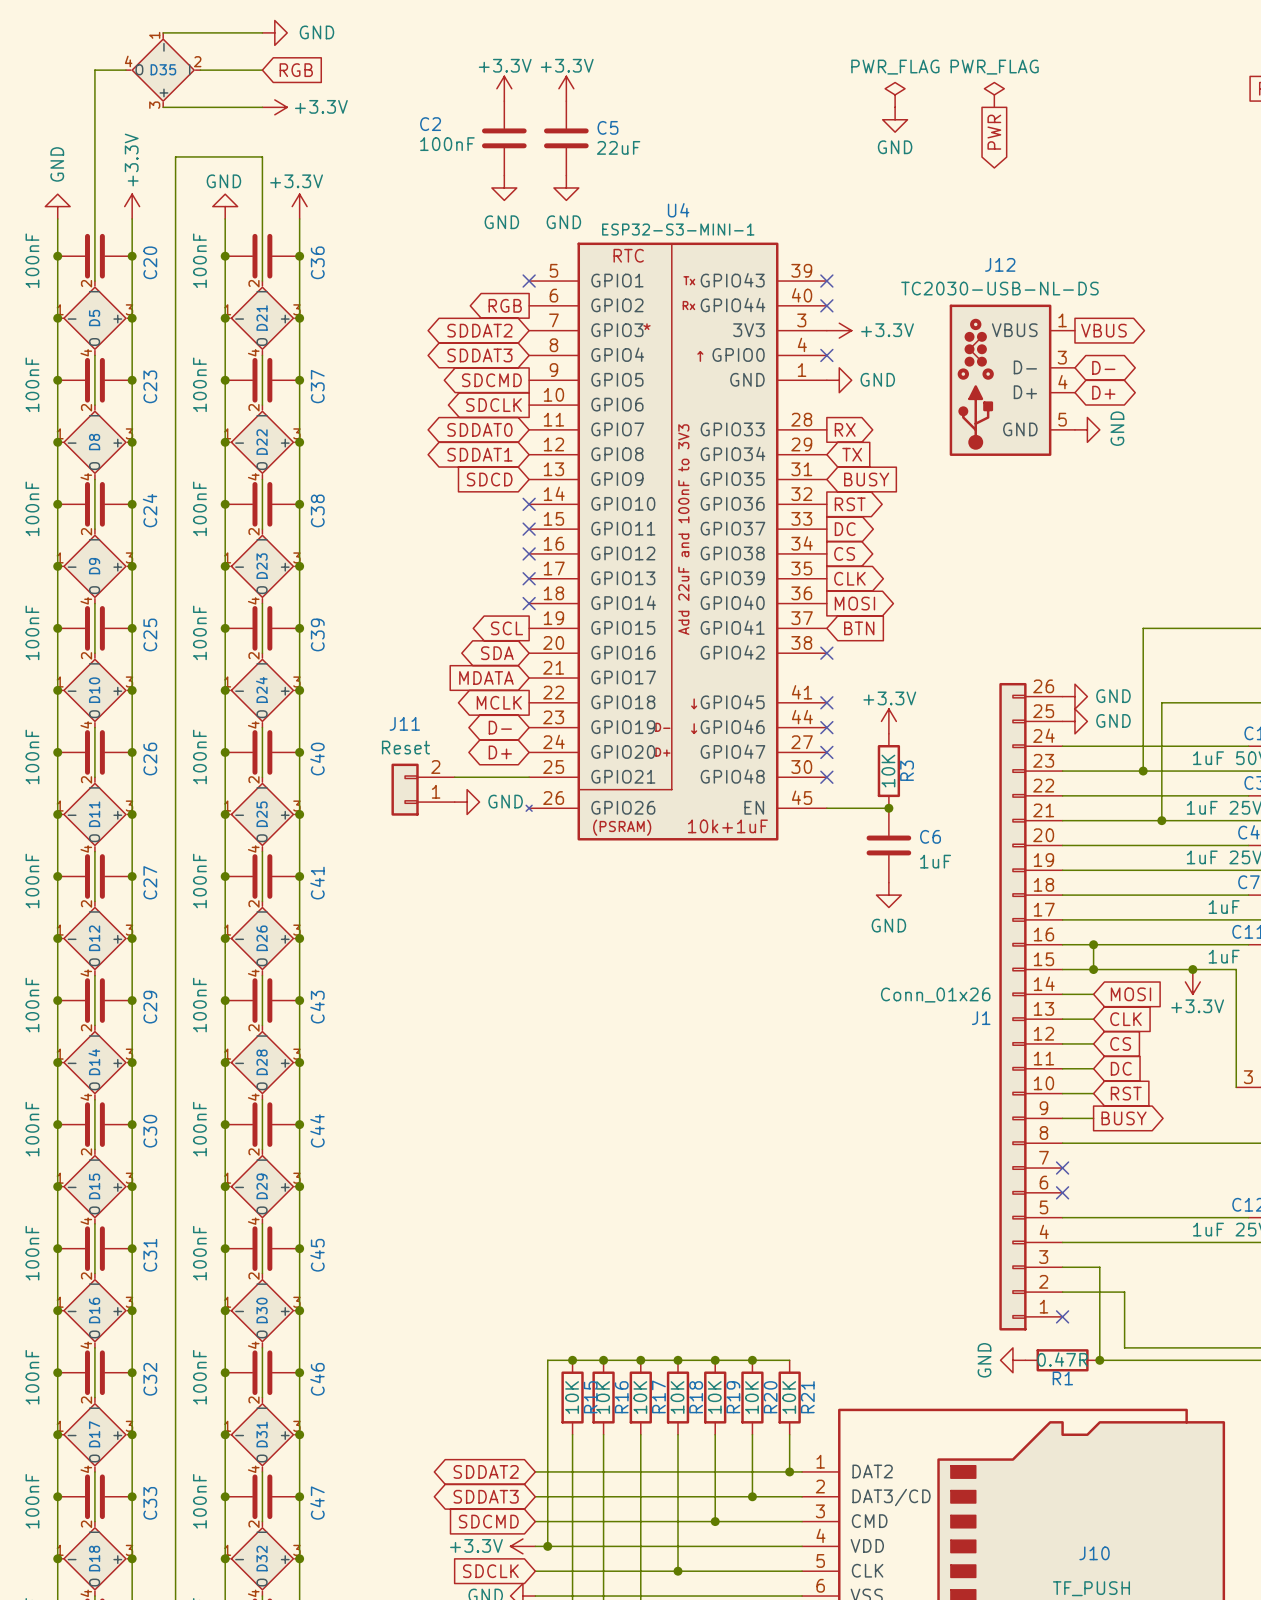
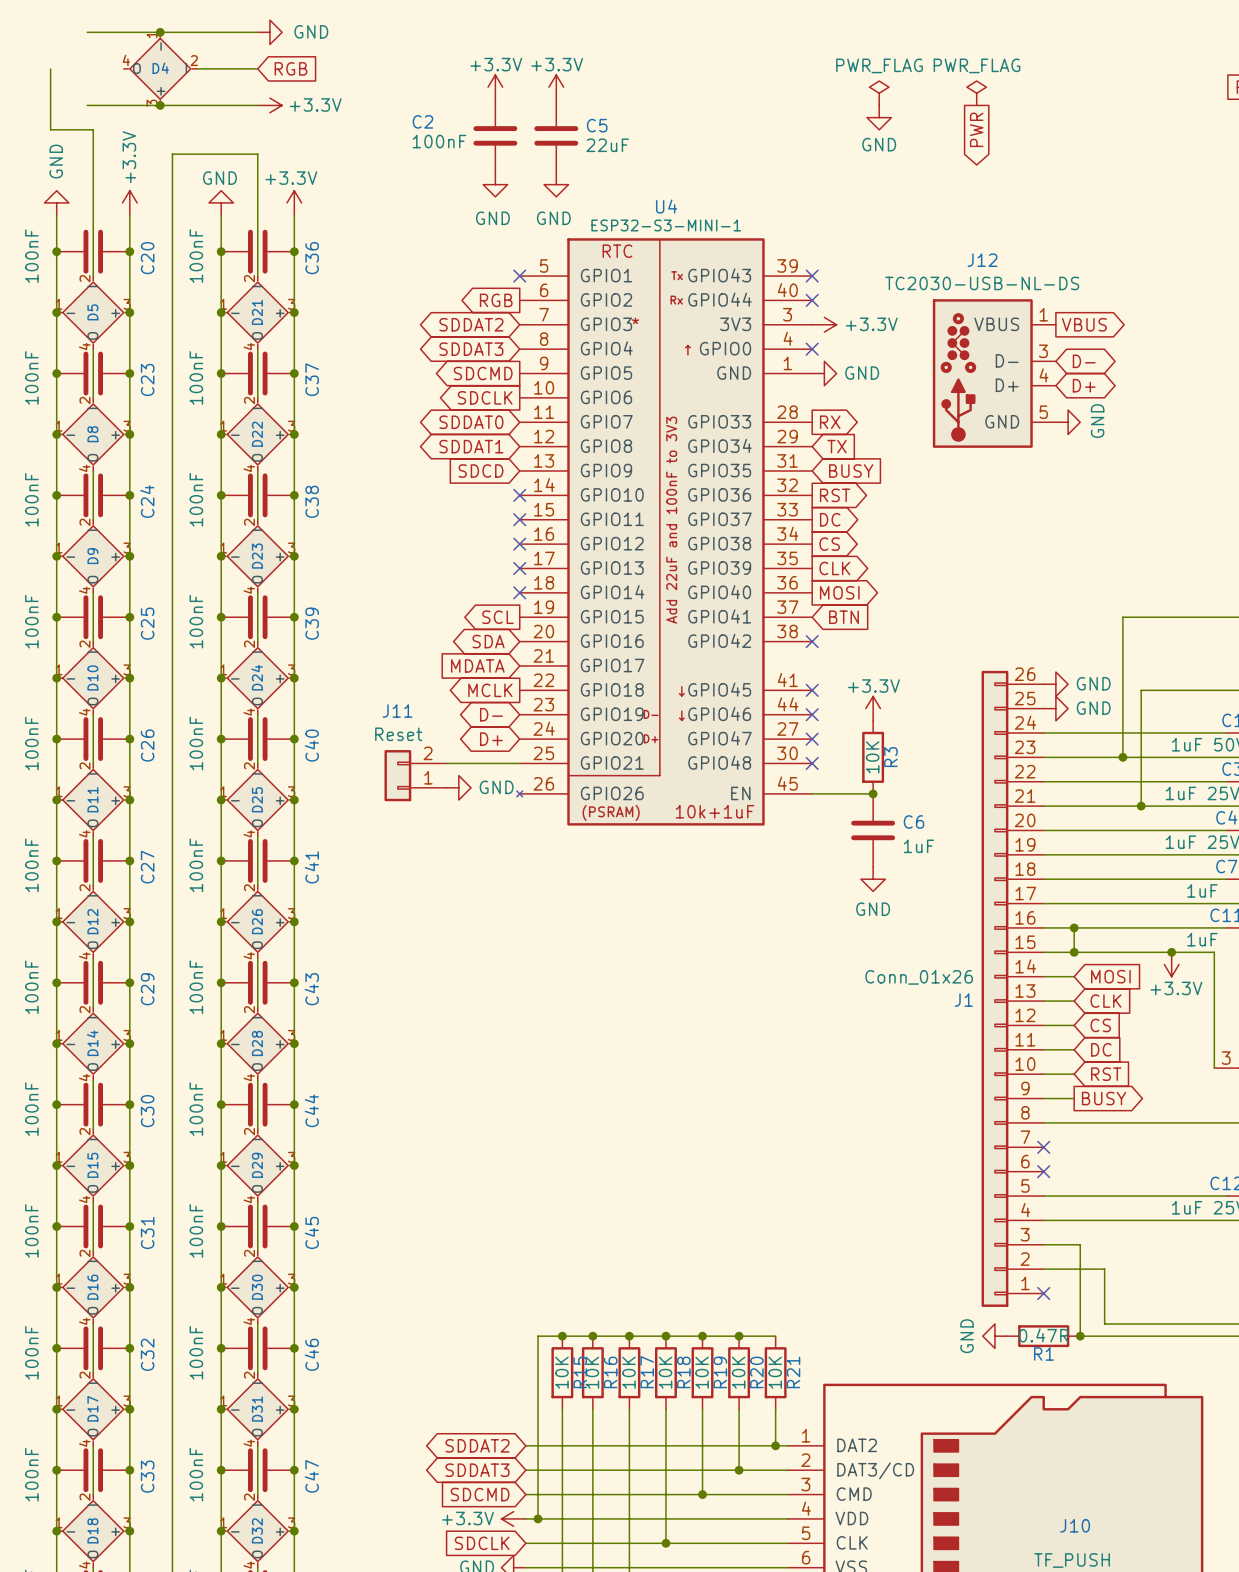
wire: none -> (87, 32) (160, 32)
junction: none -> (160, 32)
D35 name: D35 (163, 69) -> D4 (160, 68)
wire: (125, 70) (94, 70) (94, 132) -> (50, 68) (50, 129) (93, 129)
wire: none -> (87, 105) (160, 105)
junction: none -> (160, 105)

